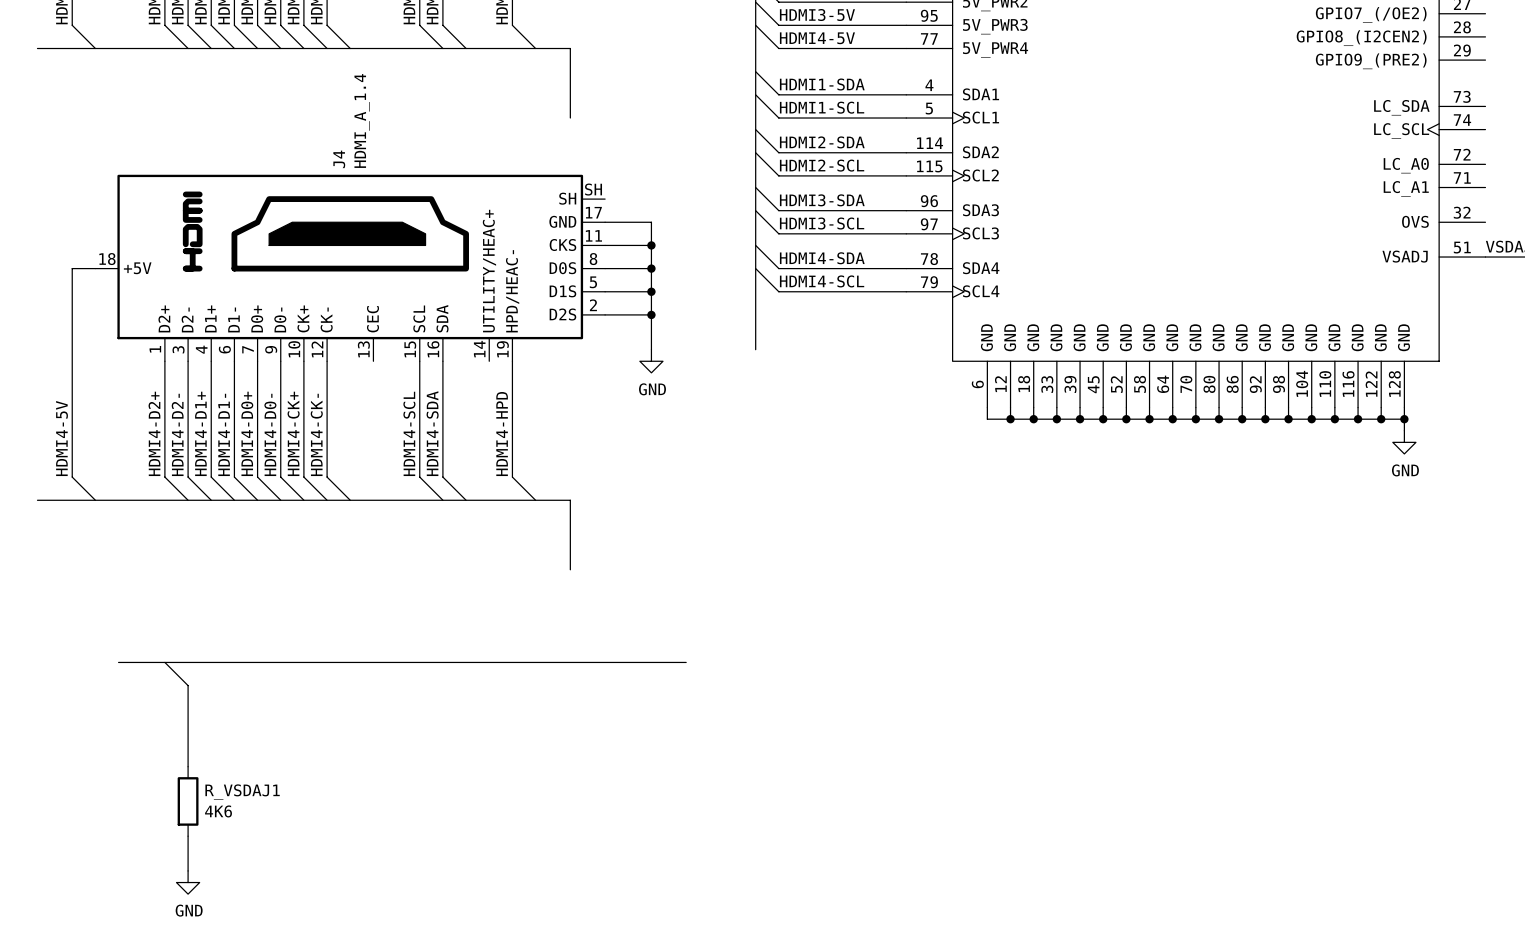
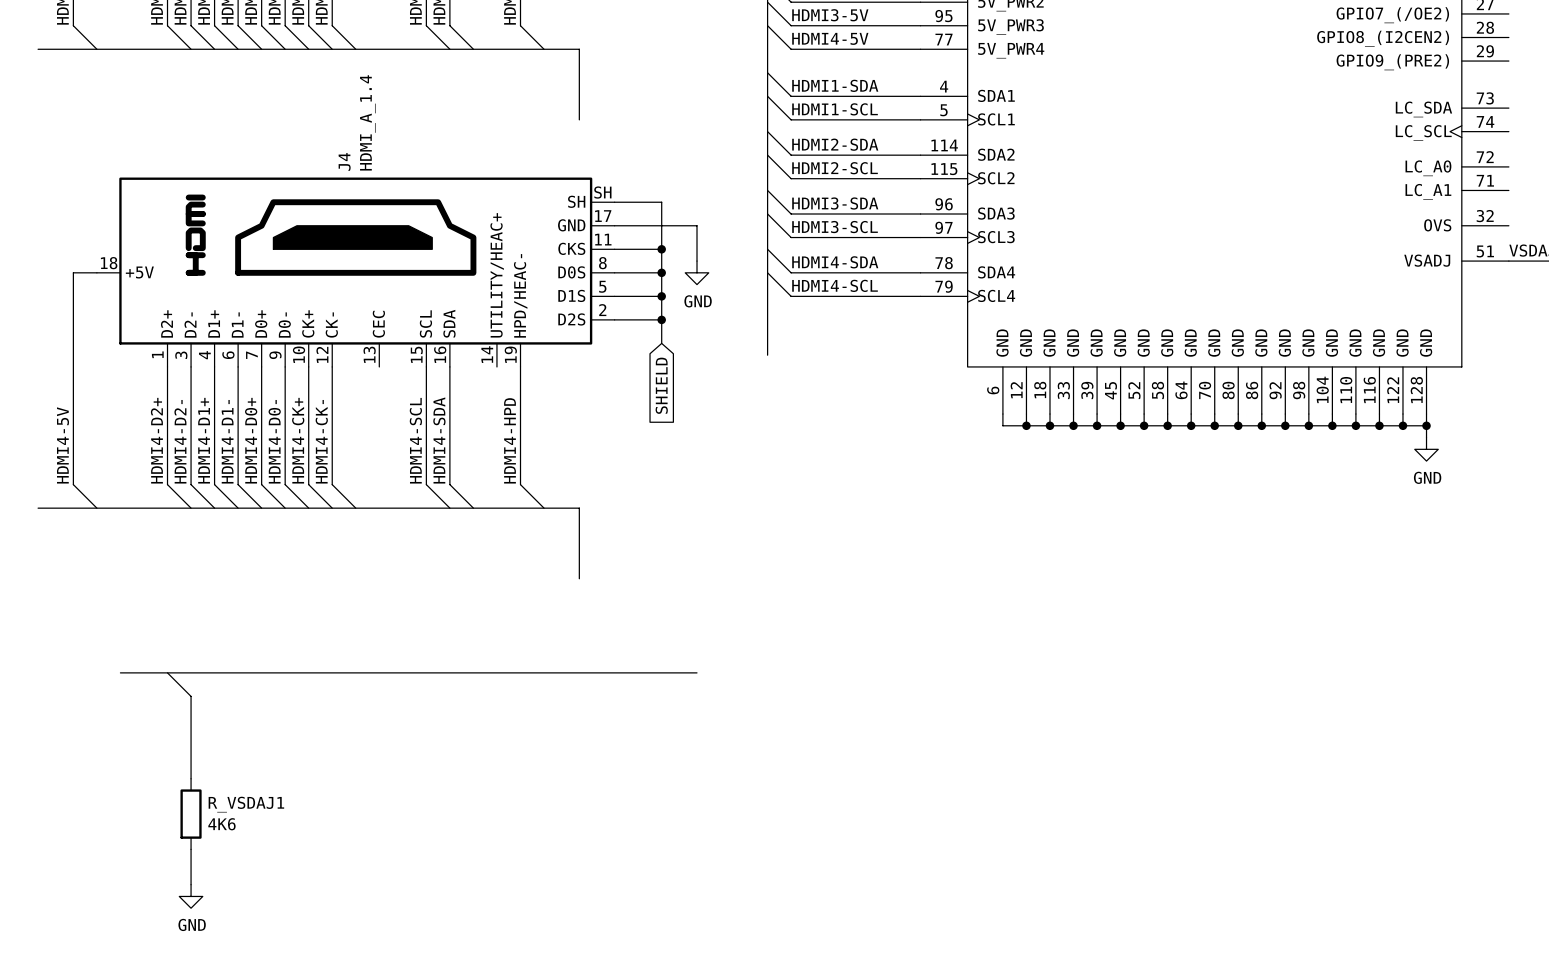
wire: none -> (614, 202) (661, 202) (661, 225) (697, 225) (697, 261)
wire: (651, 338) (651, 349) -> none
power symbol position: GND (651, 361) -> GND (697, 272)
global label: none -> SHIELD (661, 385)

